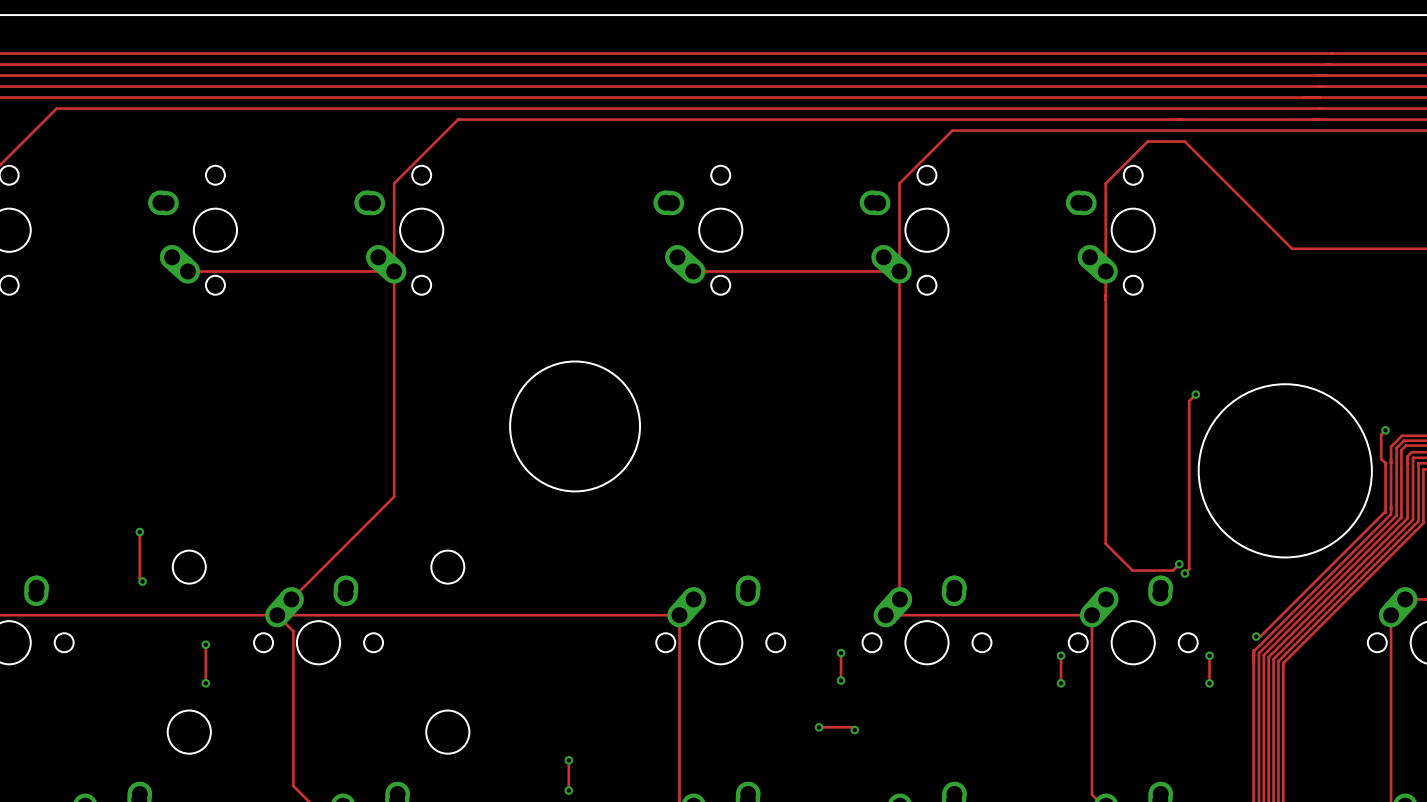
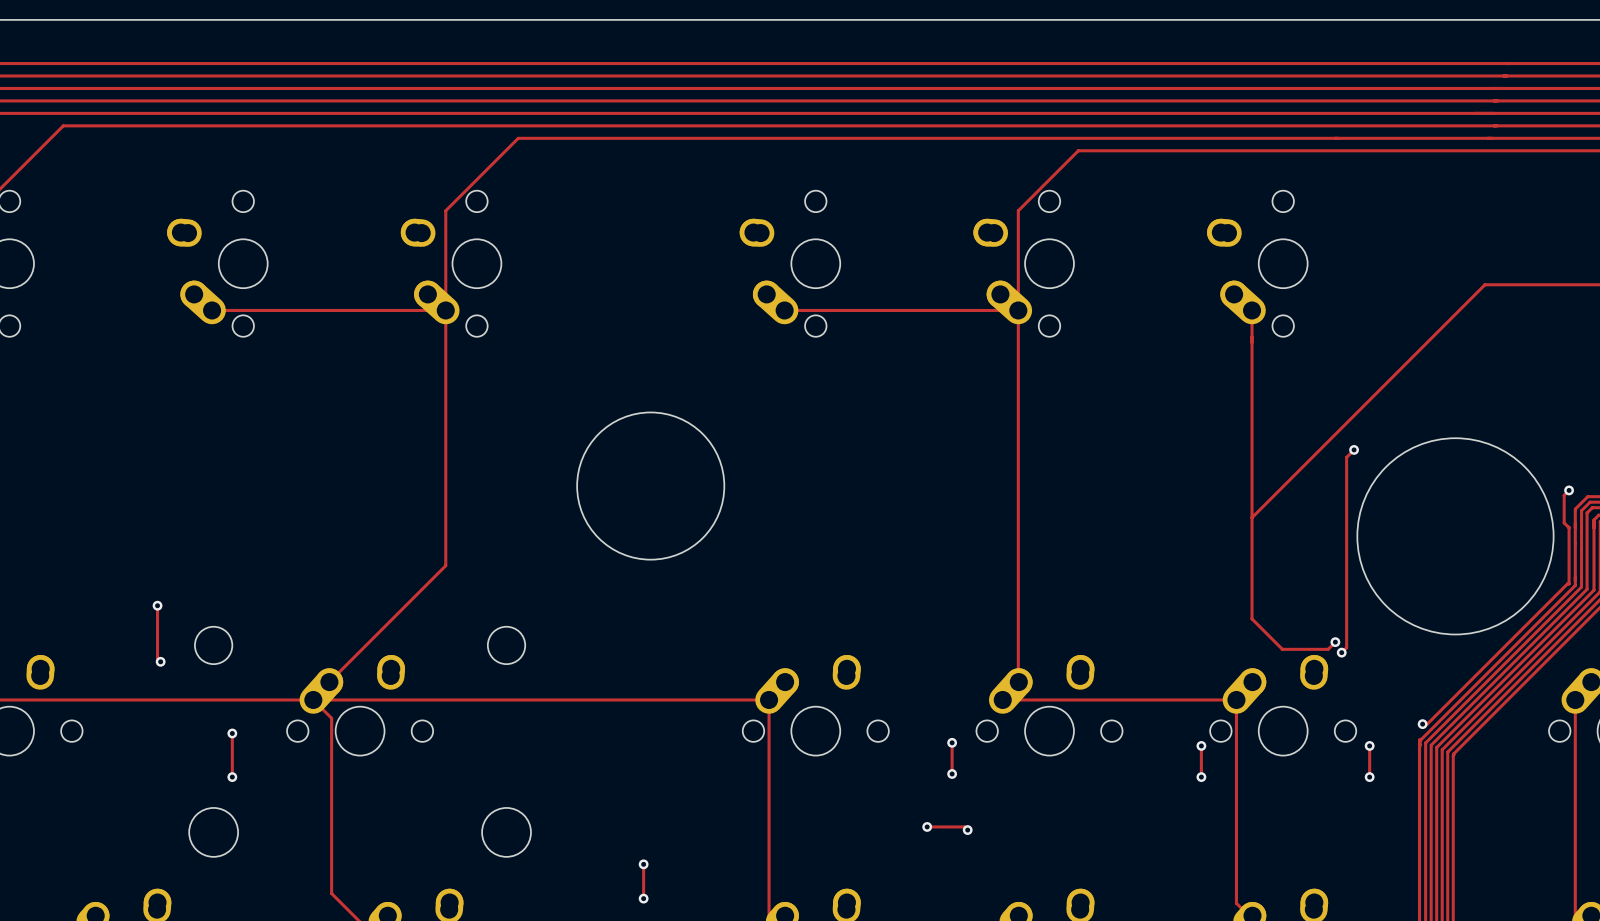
track: (1311, 248) (1292, 248) (1184, 141) (1147, 141) (1105, 183) (1105, 271) -> (1484, 284) (1252, 517)

